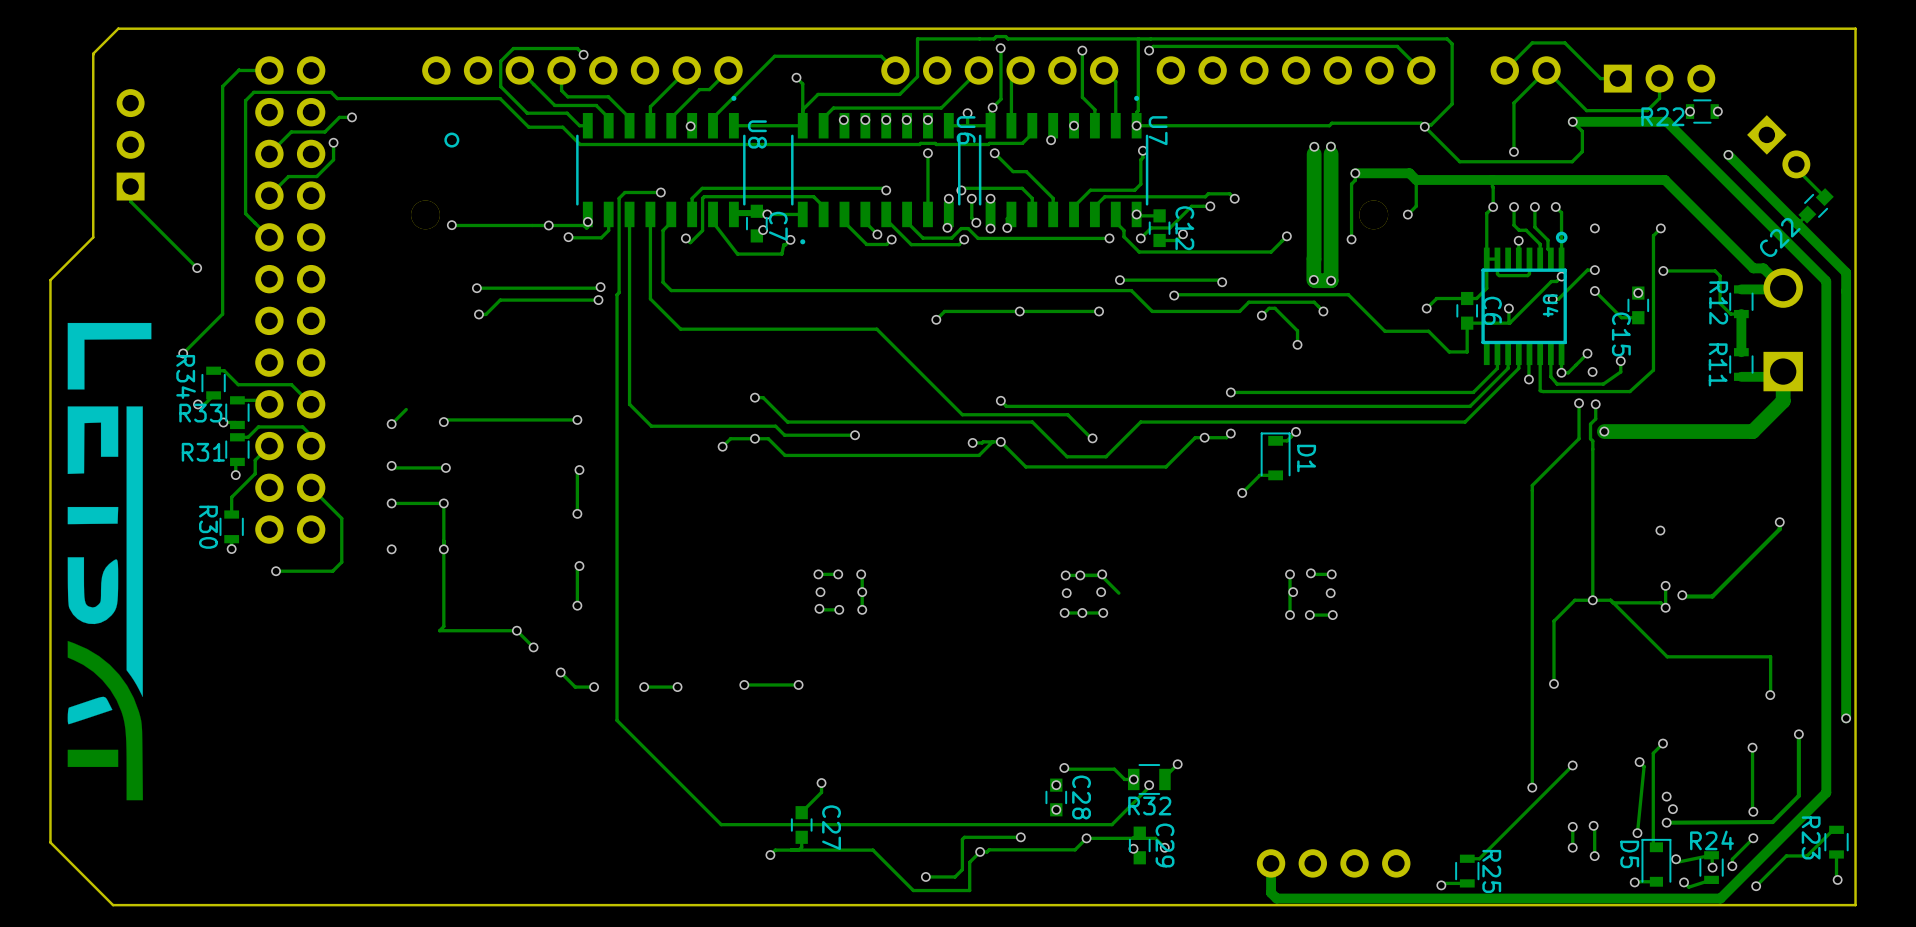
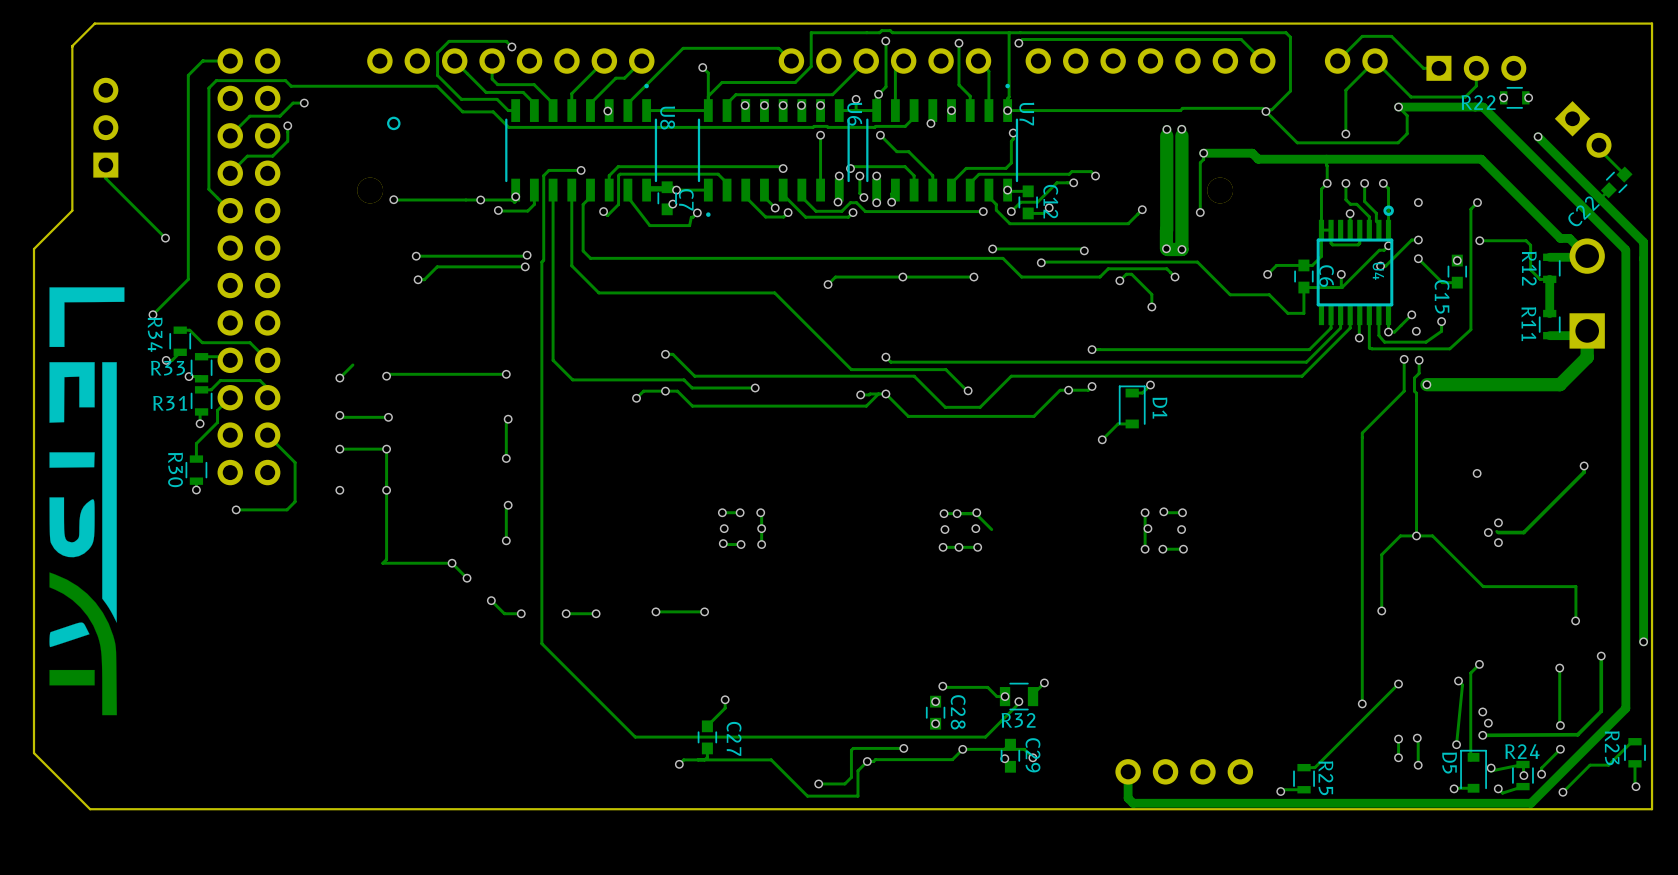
track: (1416, 179) (1416, 206) (1407, 214) -> none
via: (1407, 214) -> none
track: (1665, 585) (1665, 607) (1660, 602) (1613, 602) -> none
via: (1665, 585) -> none
via: none -> (1498, 522)
via: (1682, 595) -> none
via: none -> (1488, 532)
via: (1665, 607) -> none
via: none -> (1498, 542)

